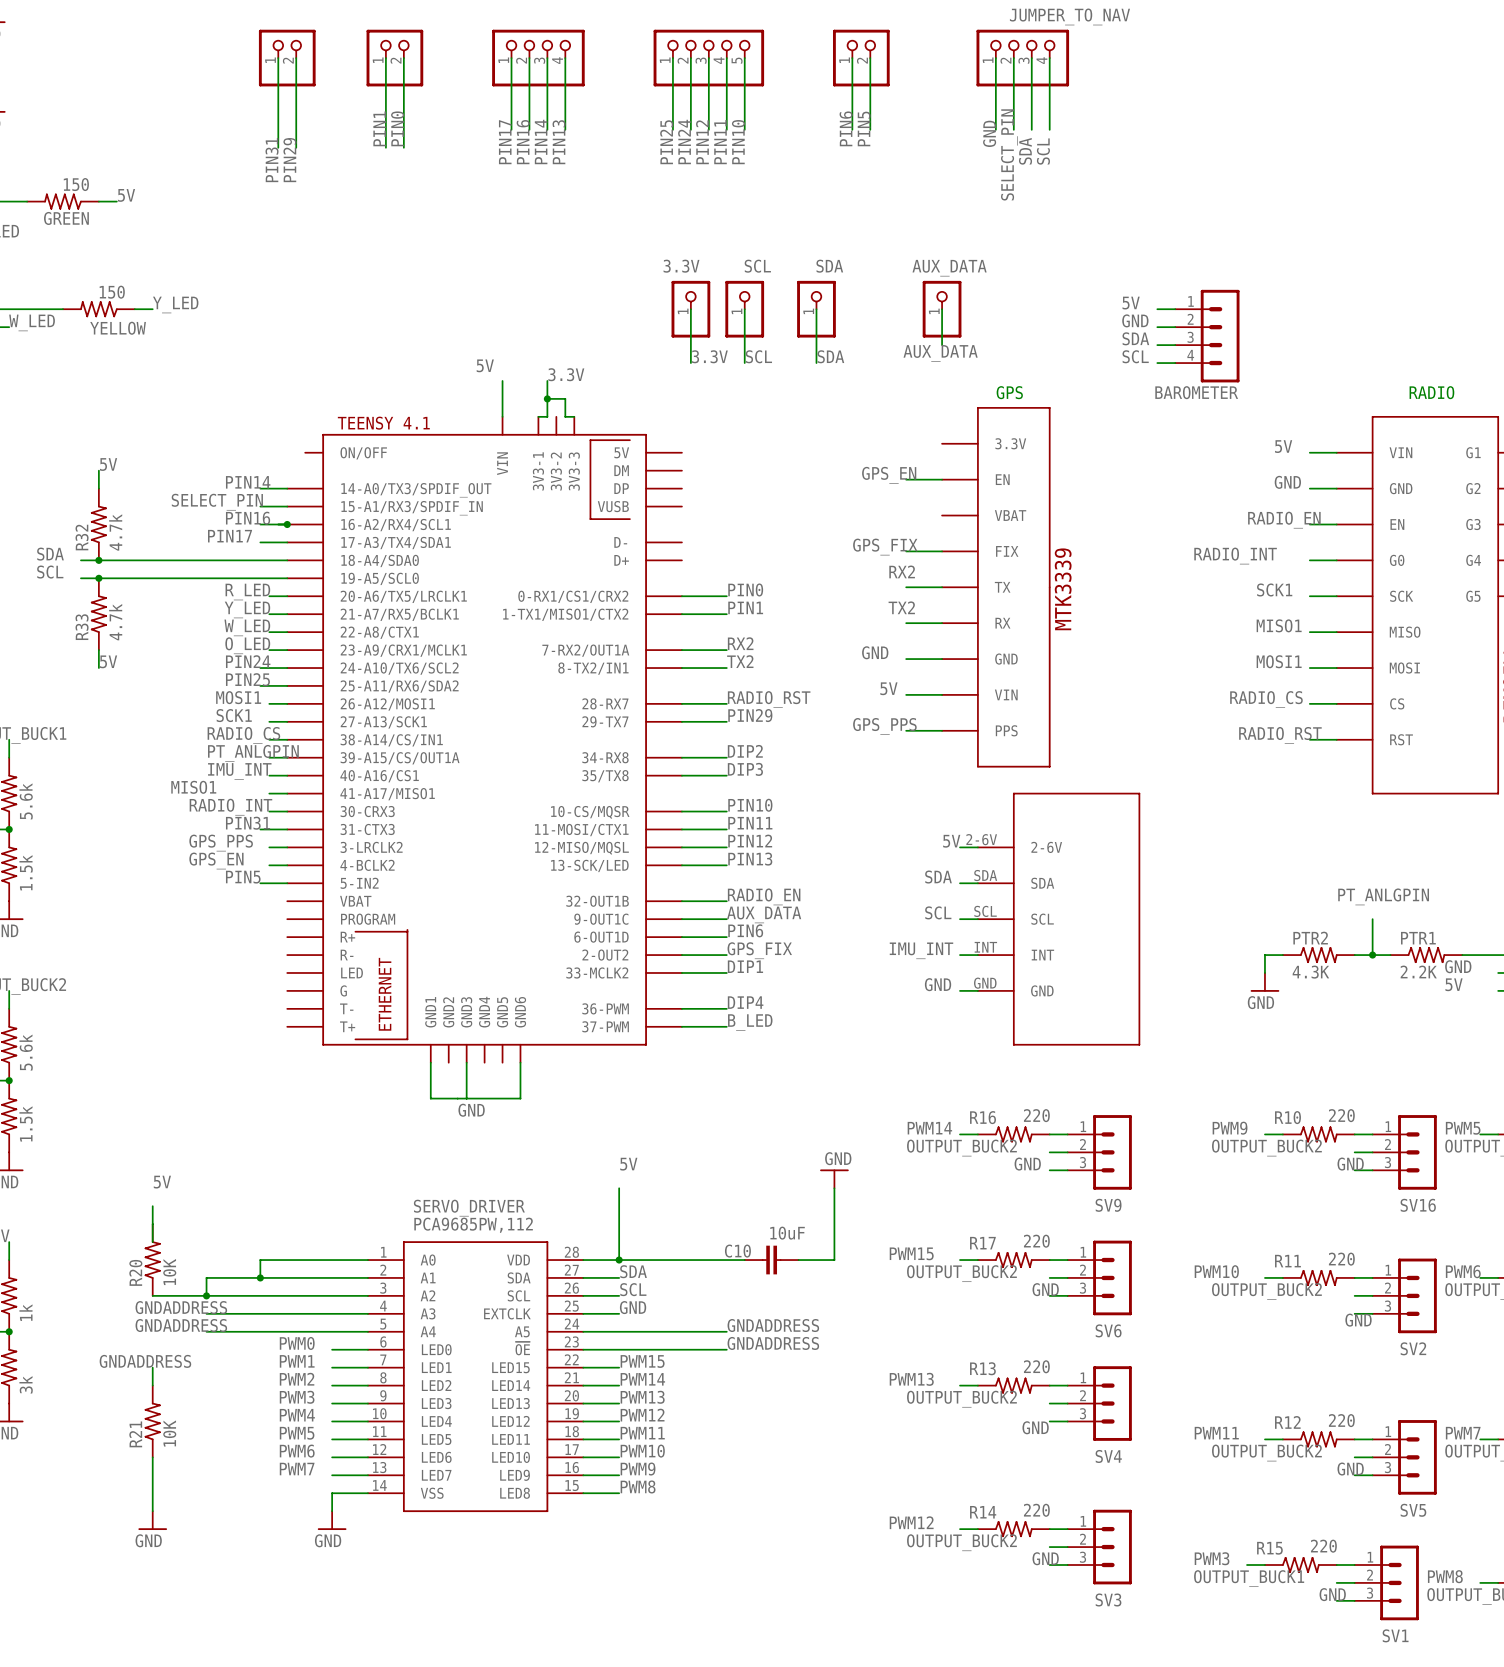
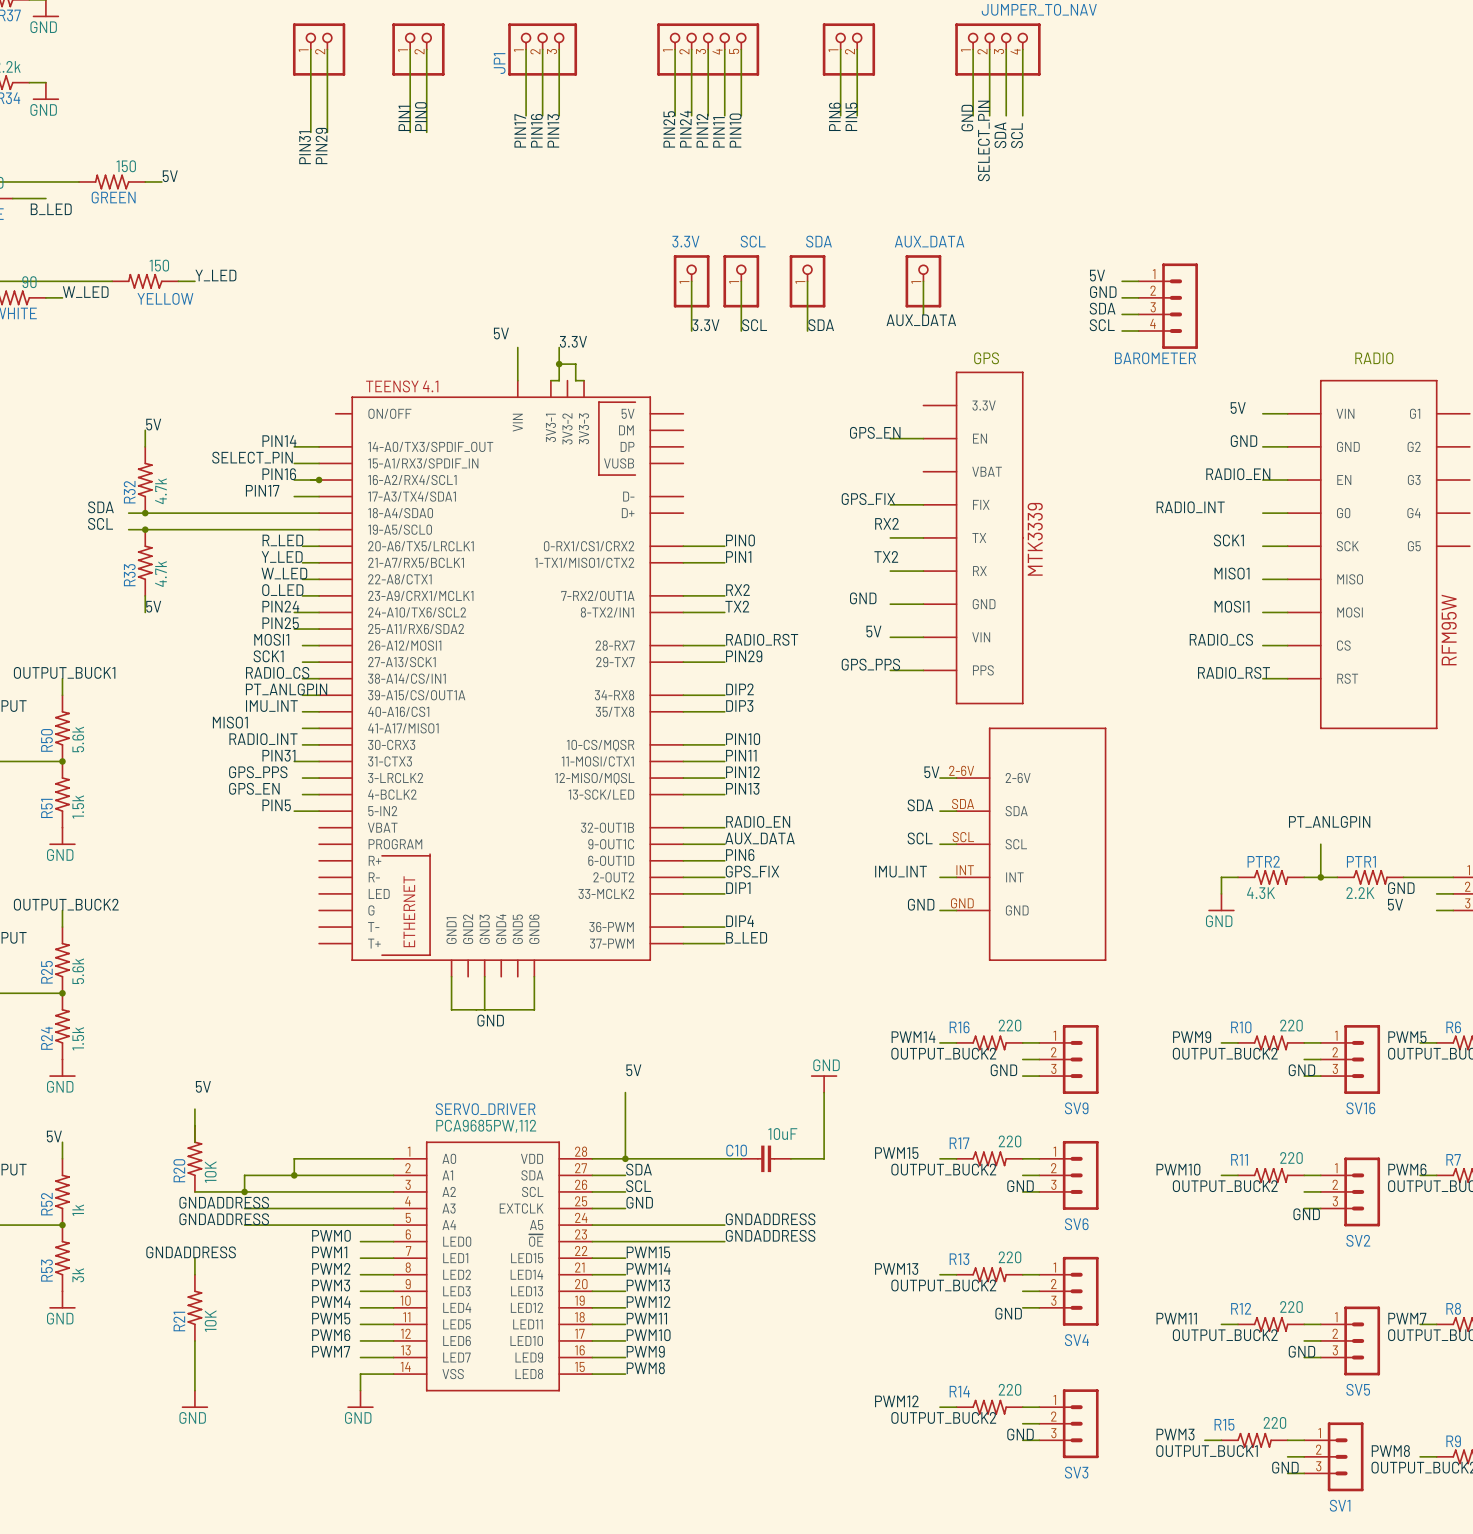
JP1: none -> (542, 49)
part: (538, 58) -> none
wire: (565, 58) (565, 129) -> none
label: PIN14 (541, 141) -> PIN13 (553, 130)
label: PIN13 (559, 142) -> none

